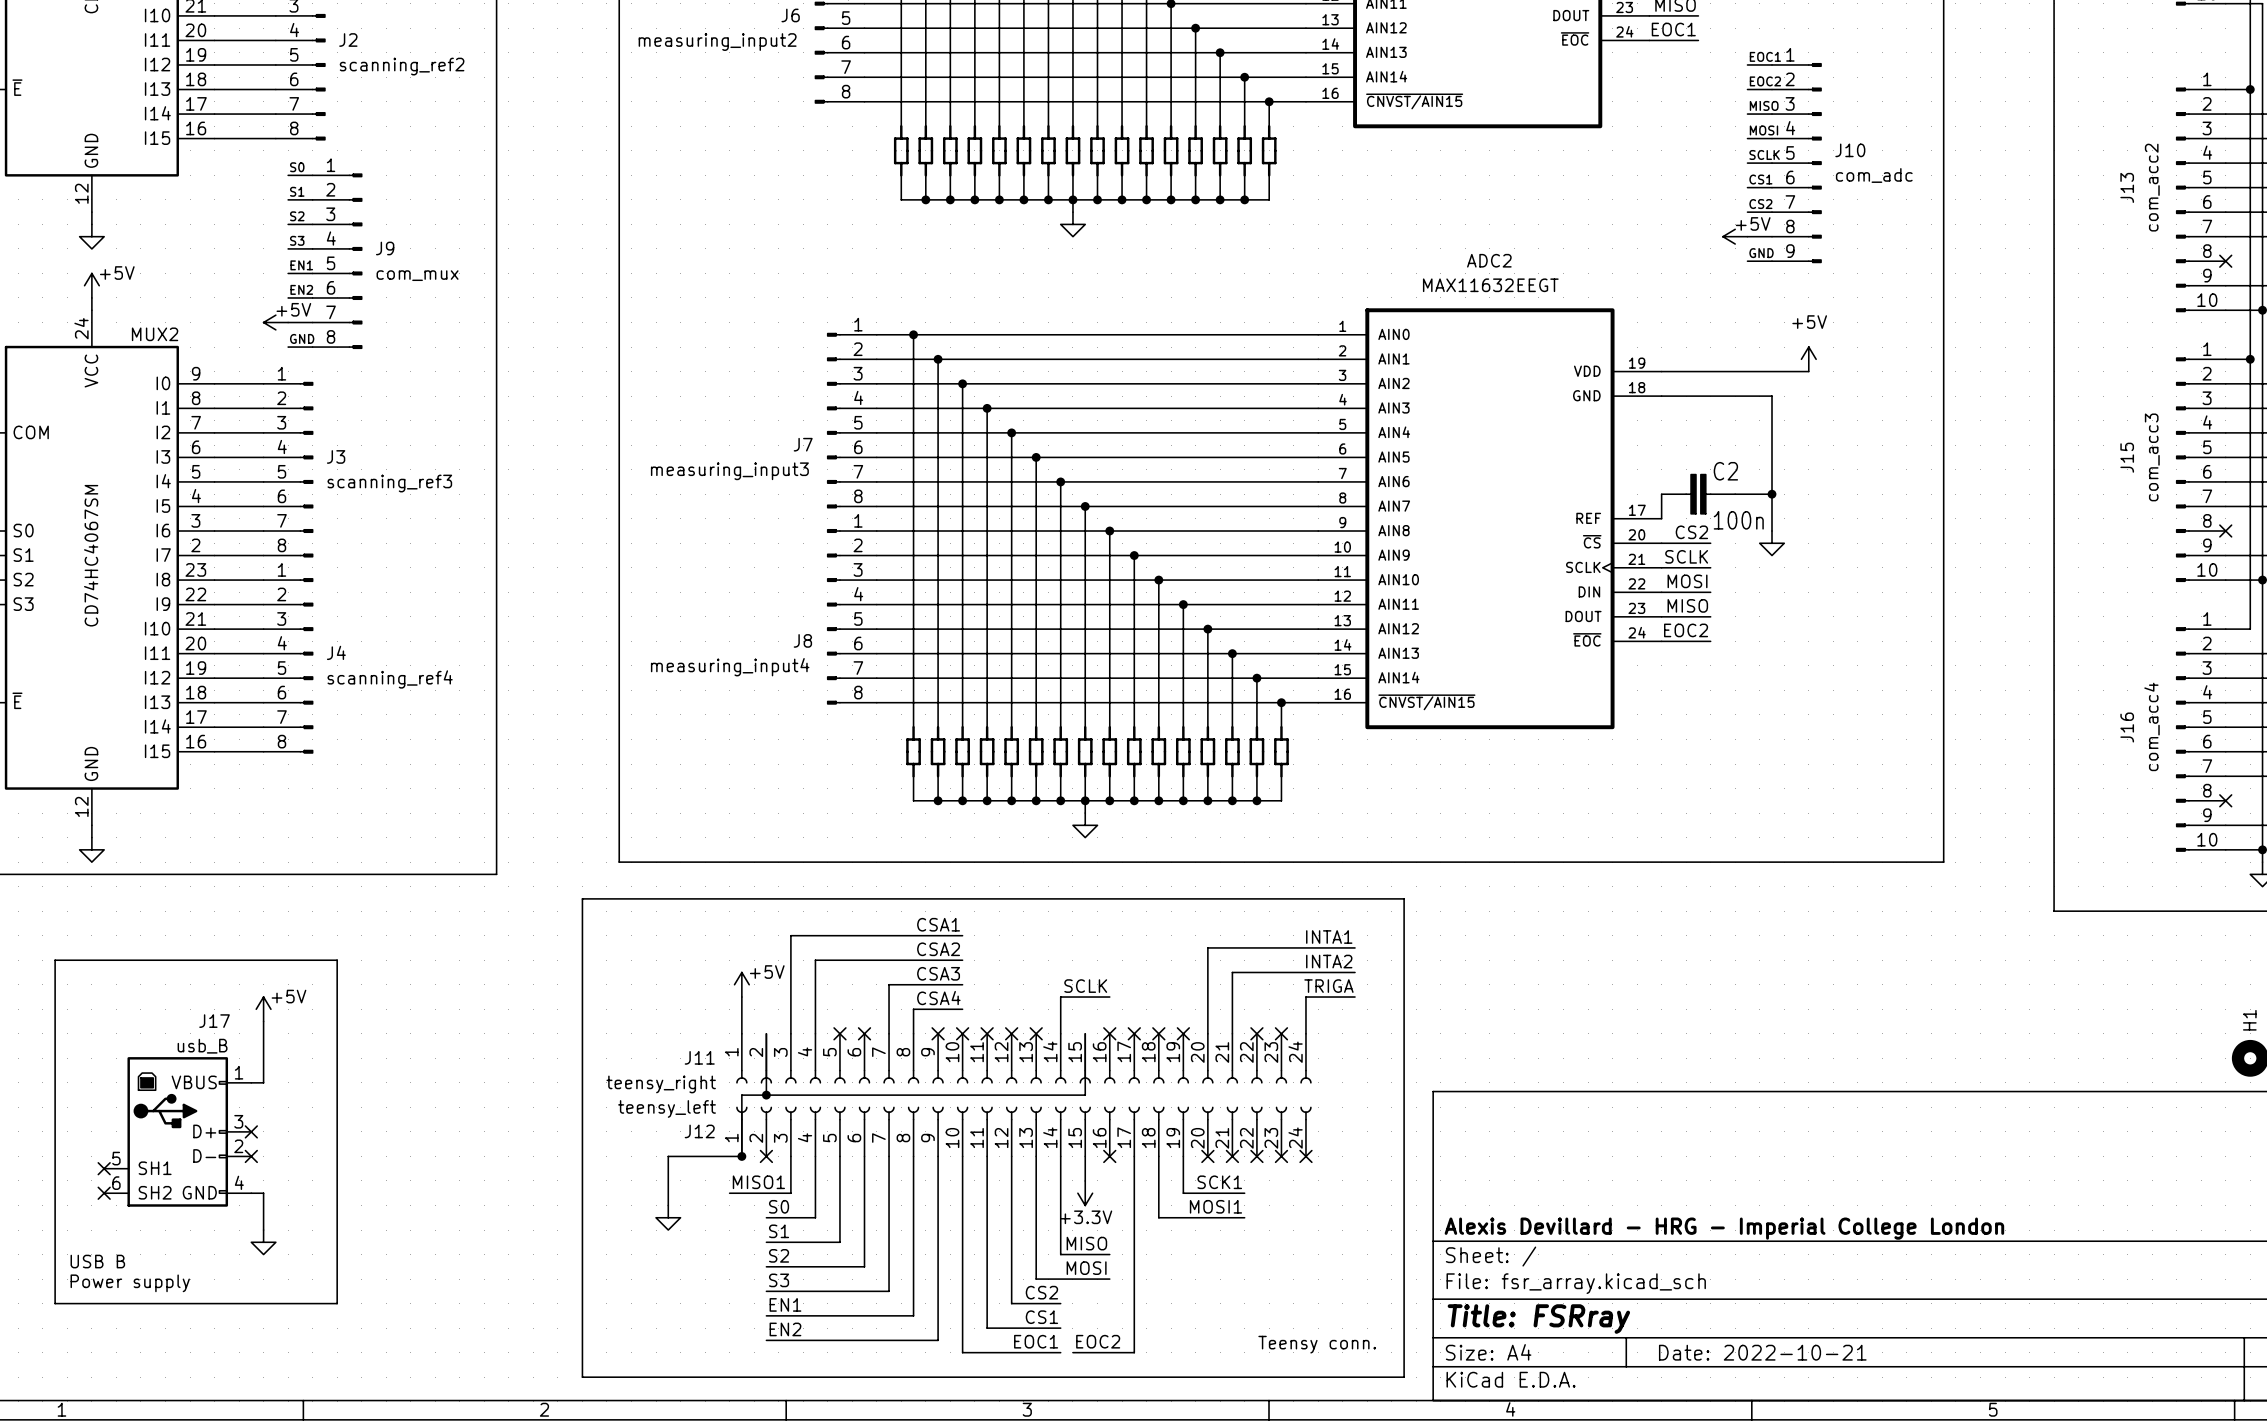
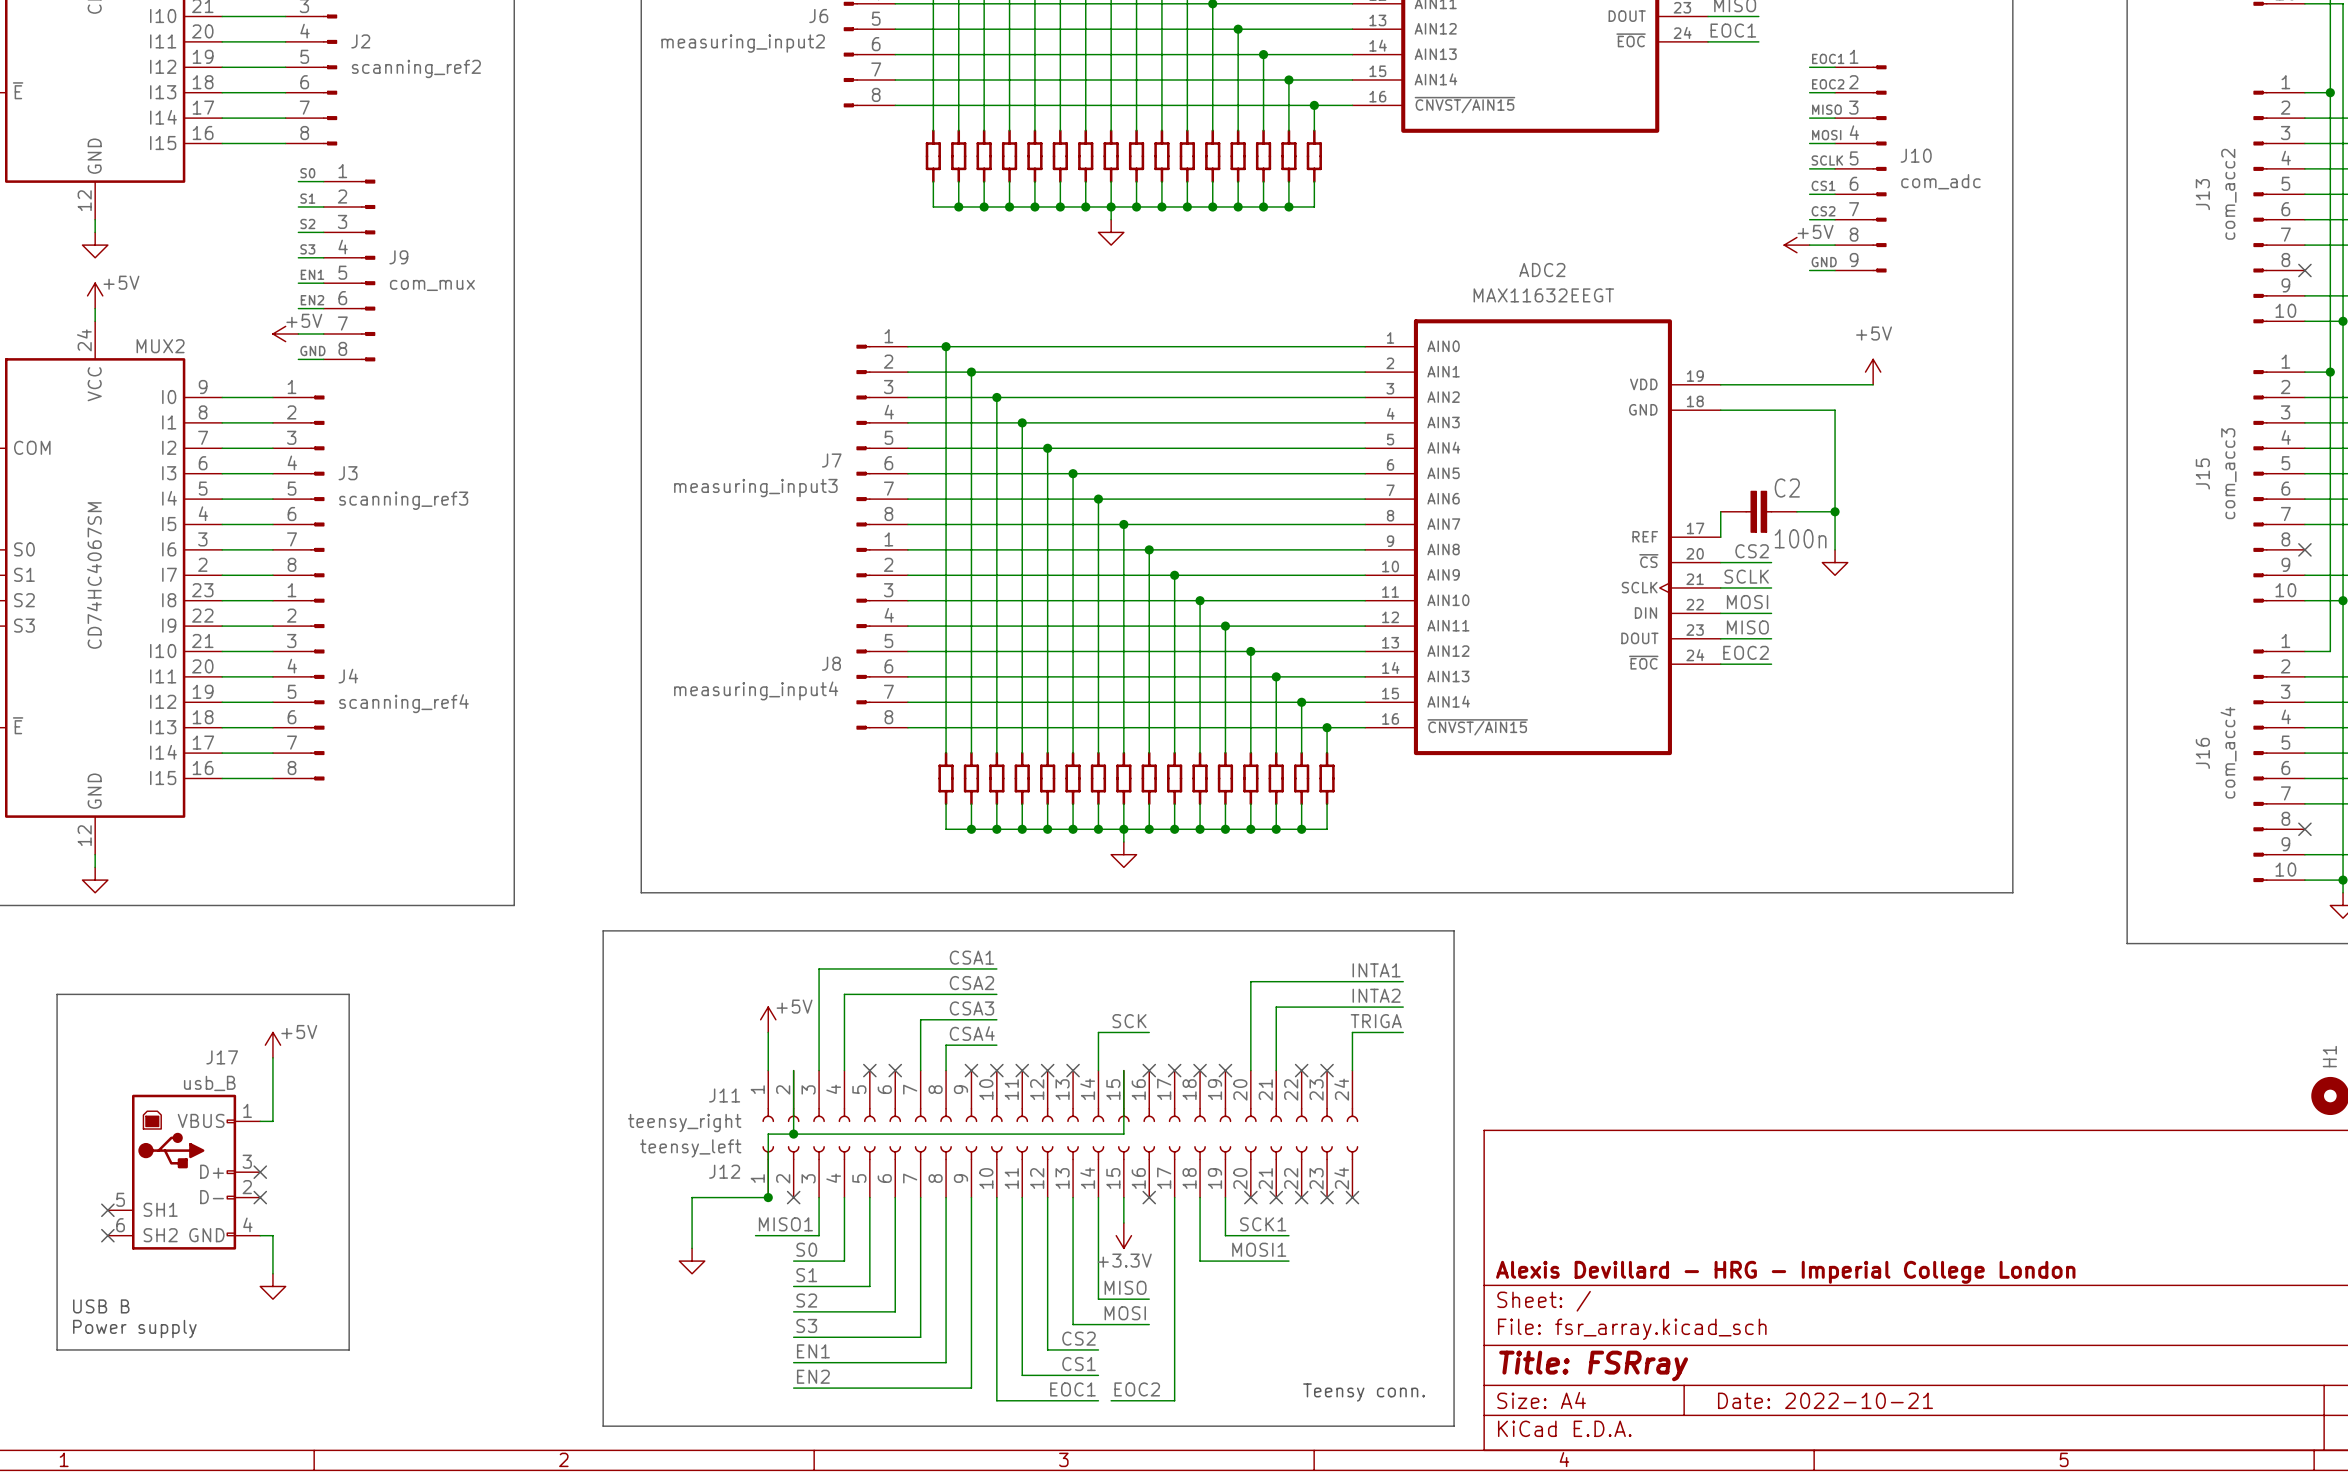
label: SCLK (1085, 986) -> SCK (1129, 1021)

